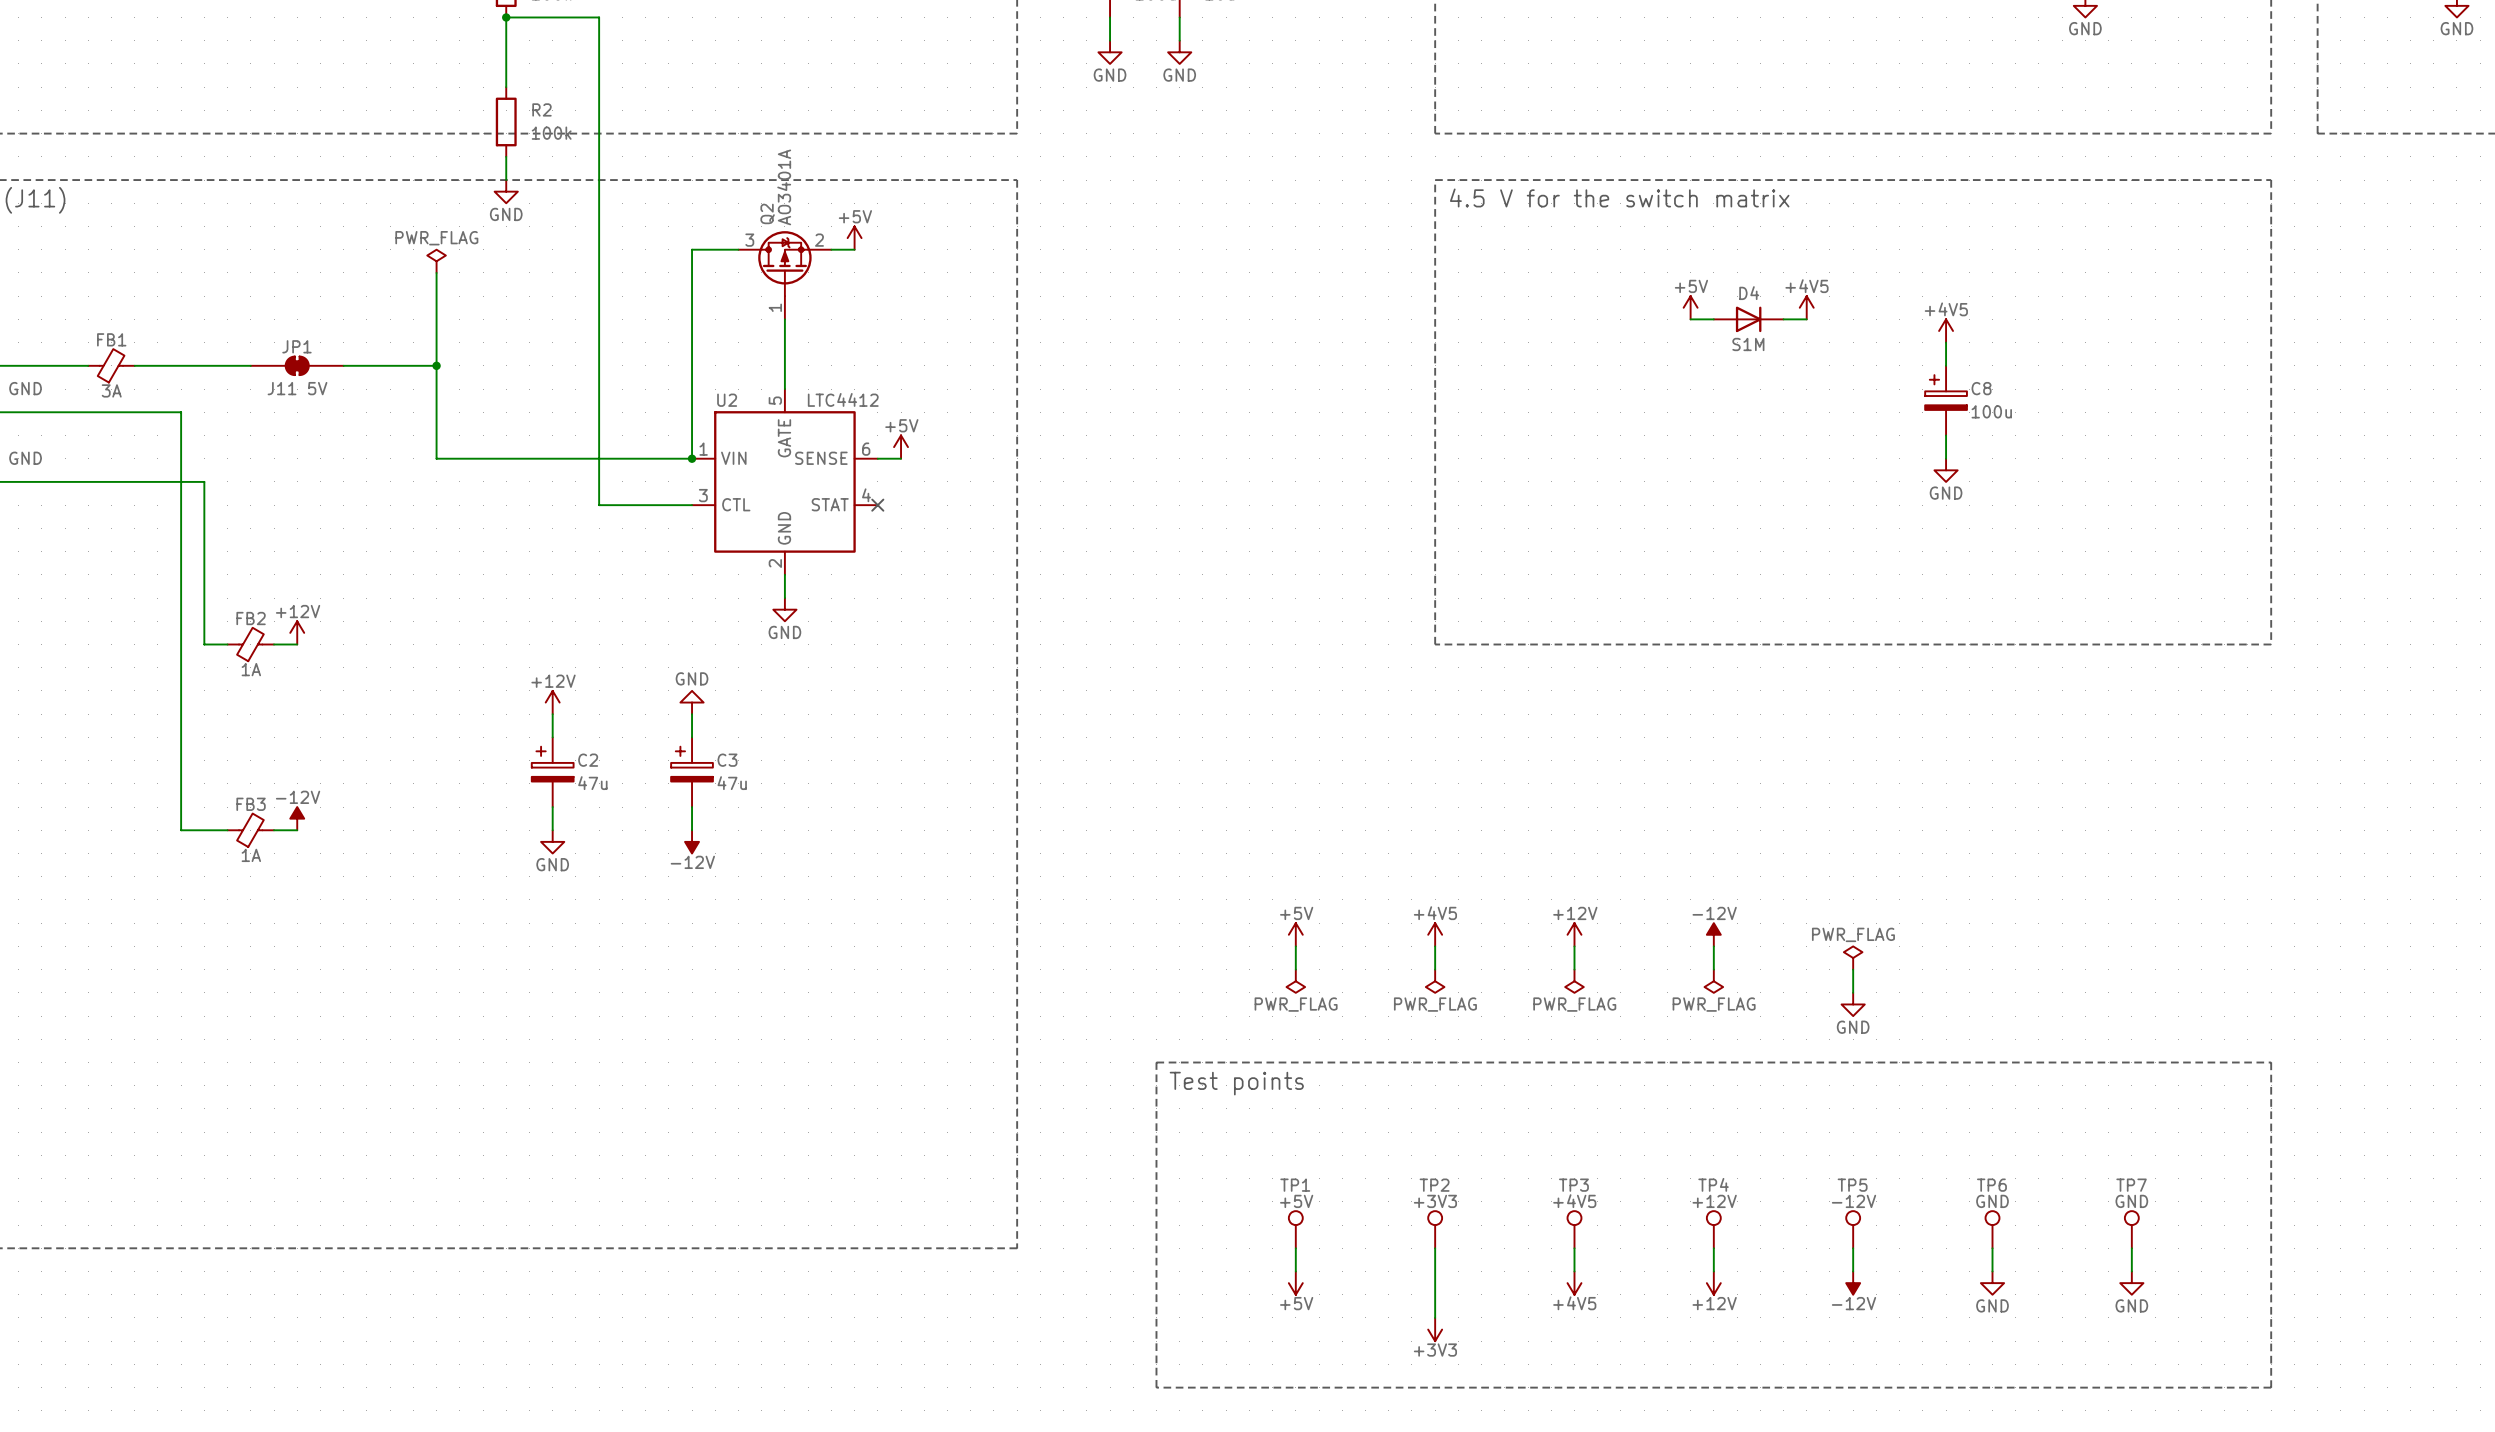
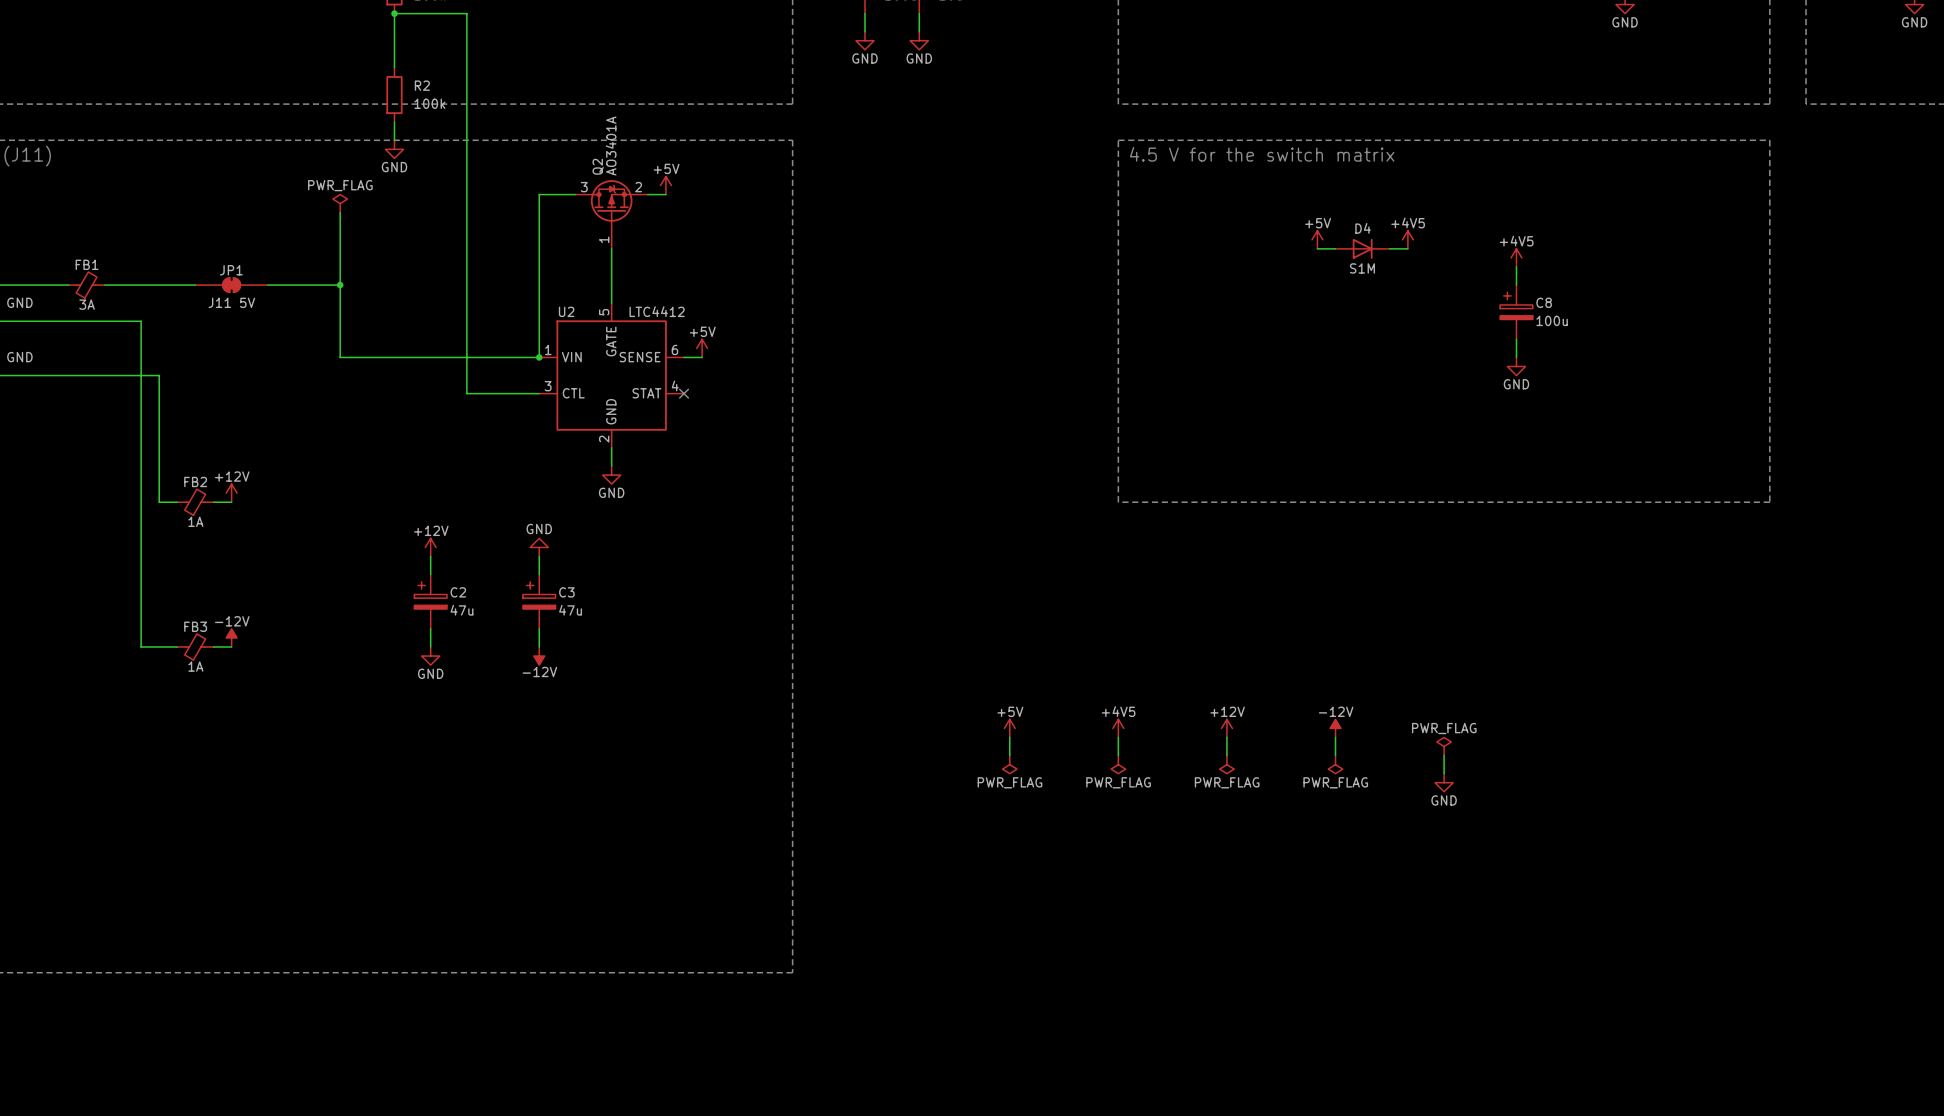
line: (1156, 1062) (2271, 1062) (2271, 1387) (1156, 1387) (1156, 1062) -> none
text: Test points (1236, 1083) -> none
TP1: +5V (1295, 1229) -> none
TP2: +3V3 (1435, 1229) -> none
TP3: +4V5 (1574, 1229) -> none
TP4: +12V (1713, 1229) -> none
TP5: -12V (1853, 1229) -> none
TP6: GND (1992, 1229) -> none
TP7: GND (2131, 1229) -> none
wire: (1295, 1248) (1295, 1271) -> none
wire: (1435, 1248) (1435, 1317) -> none
wire: (1574, 1248) (1574, 1271) -> none
wire: (1713, 1248) (1713, 1271) -> none
wire: (1853, 1248) (1853, 1271) -> none
wire: (1992, 1248) (1992, 1271) -> none
wire: (2131, 1248) (2131, 1271) -> none
power symbol: +5V (1295, 1283) -> none
power symbol: +4V5 (1574, 1283) -> none
power symbol: +12V (1713, 1283) -> none
power symbol: -12V (1853, 1283) -> none
power symbol: GND (1992, 1283) -> none
power symbol: GND (2131, 1283) -> none
power symbol: +3V3 (1435, 1329) -> none

